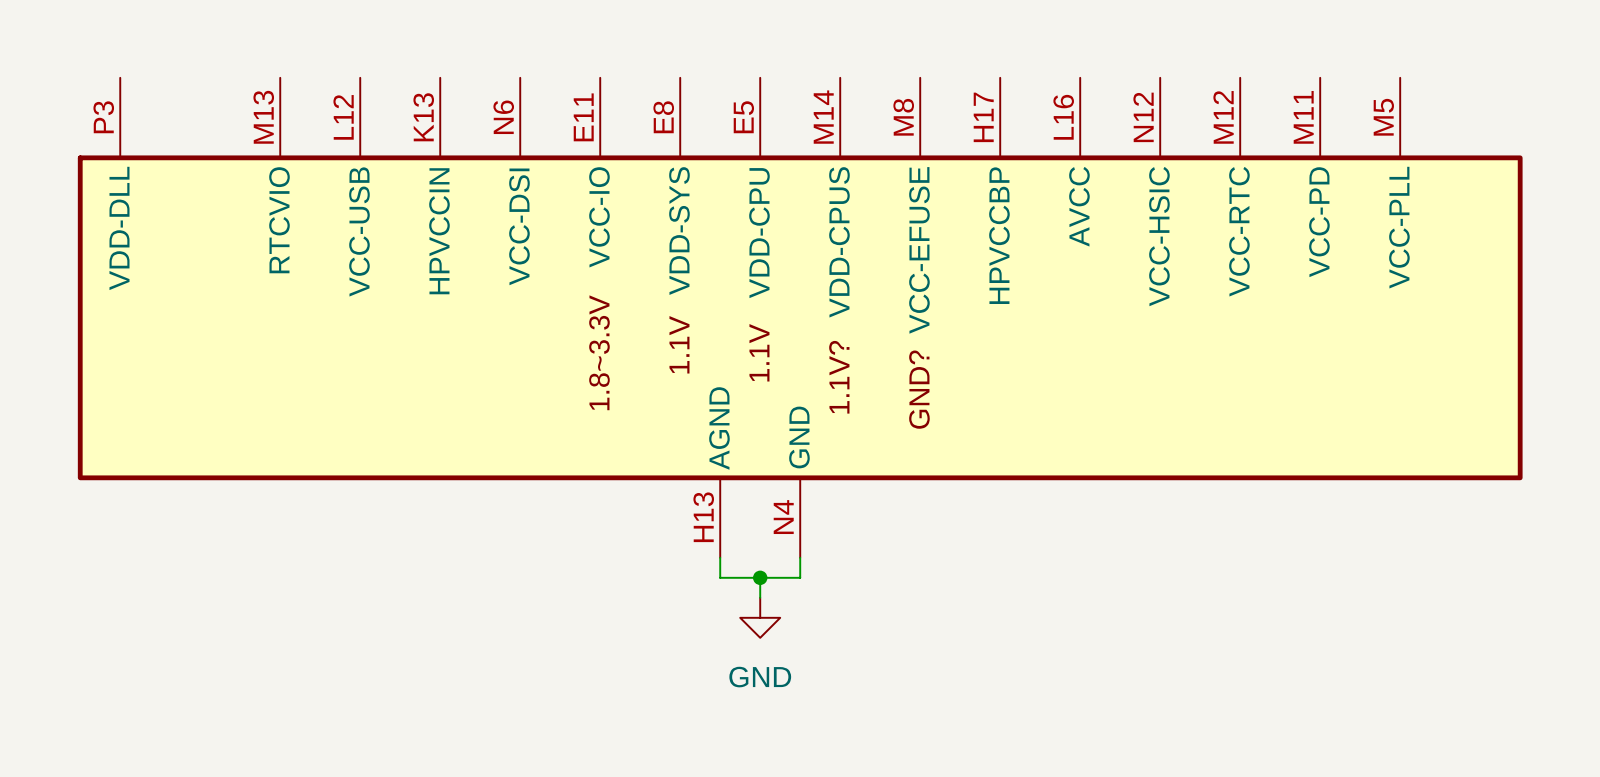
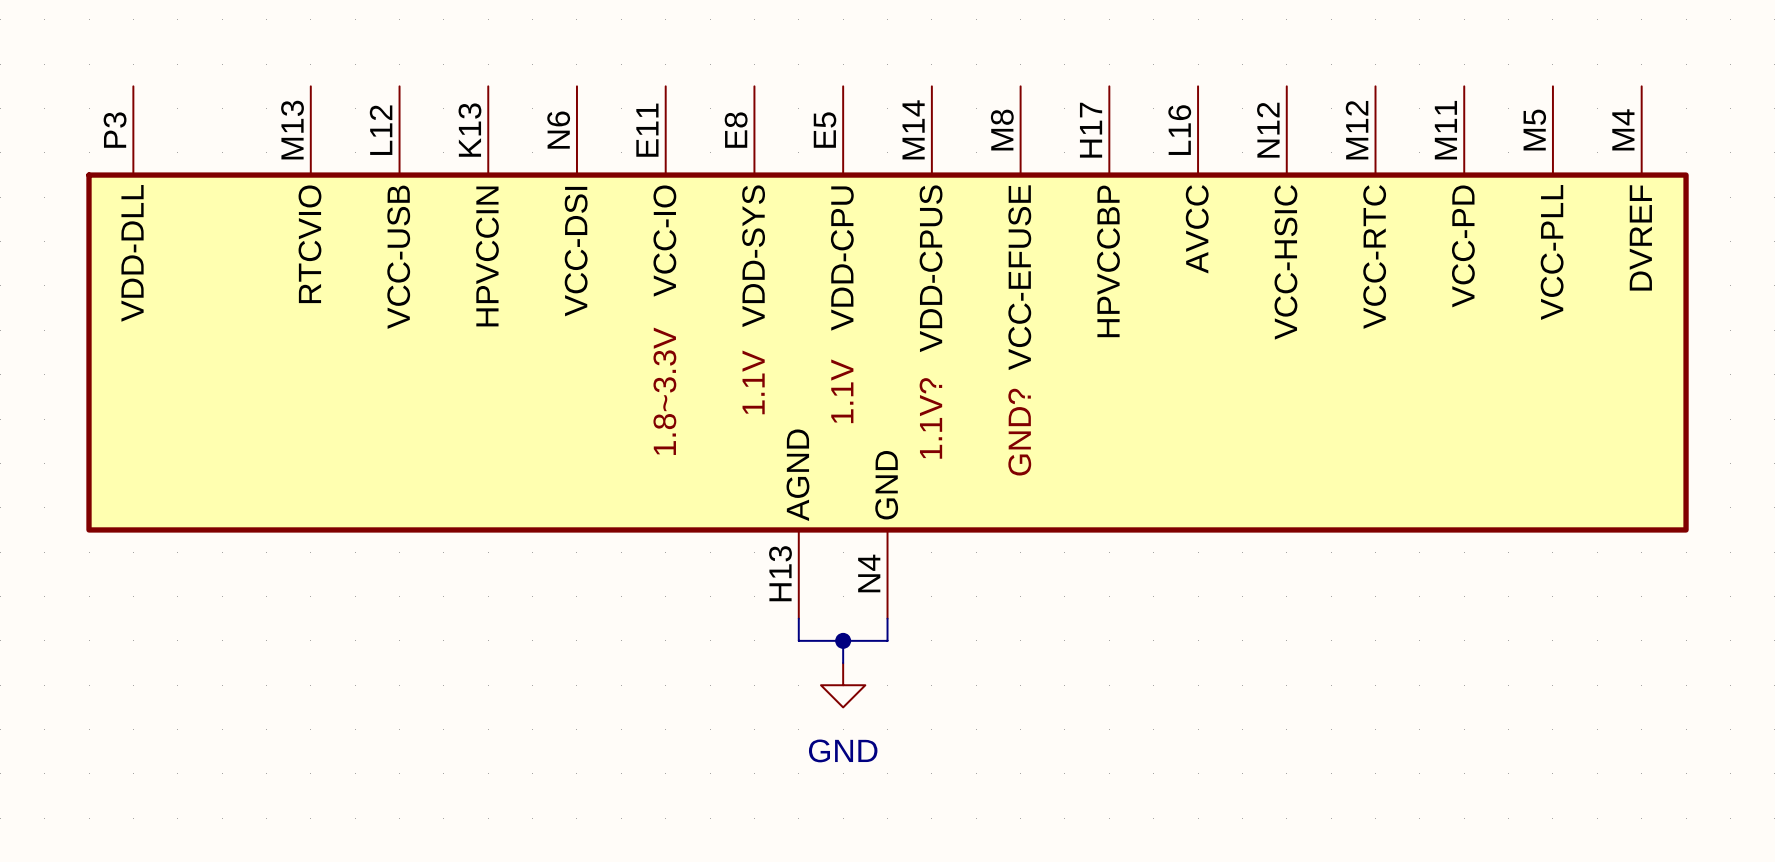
part symbol: [77, 77, 1523, 558] -> [86, 86, 1689, 619]

